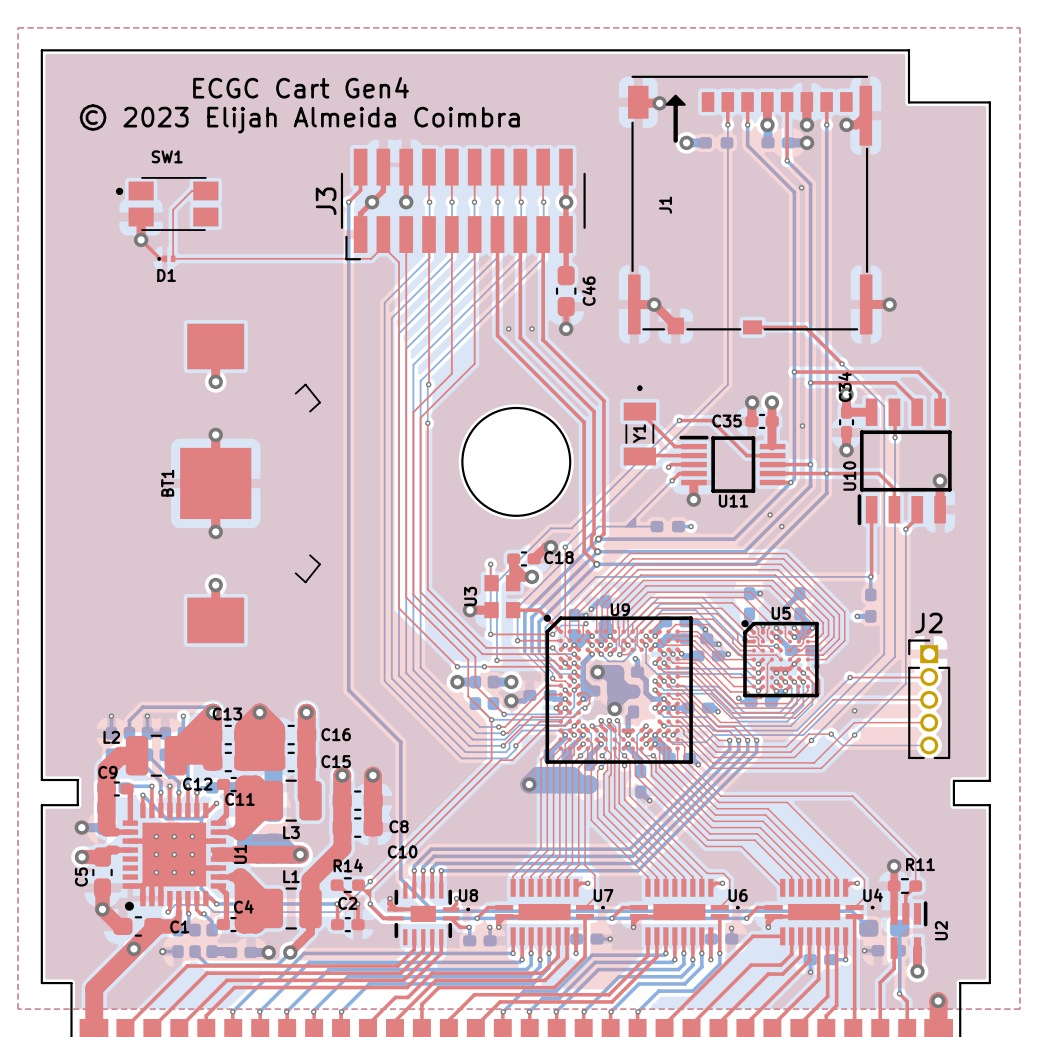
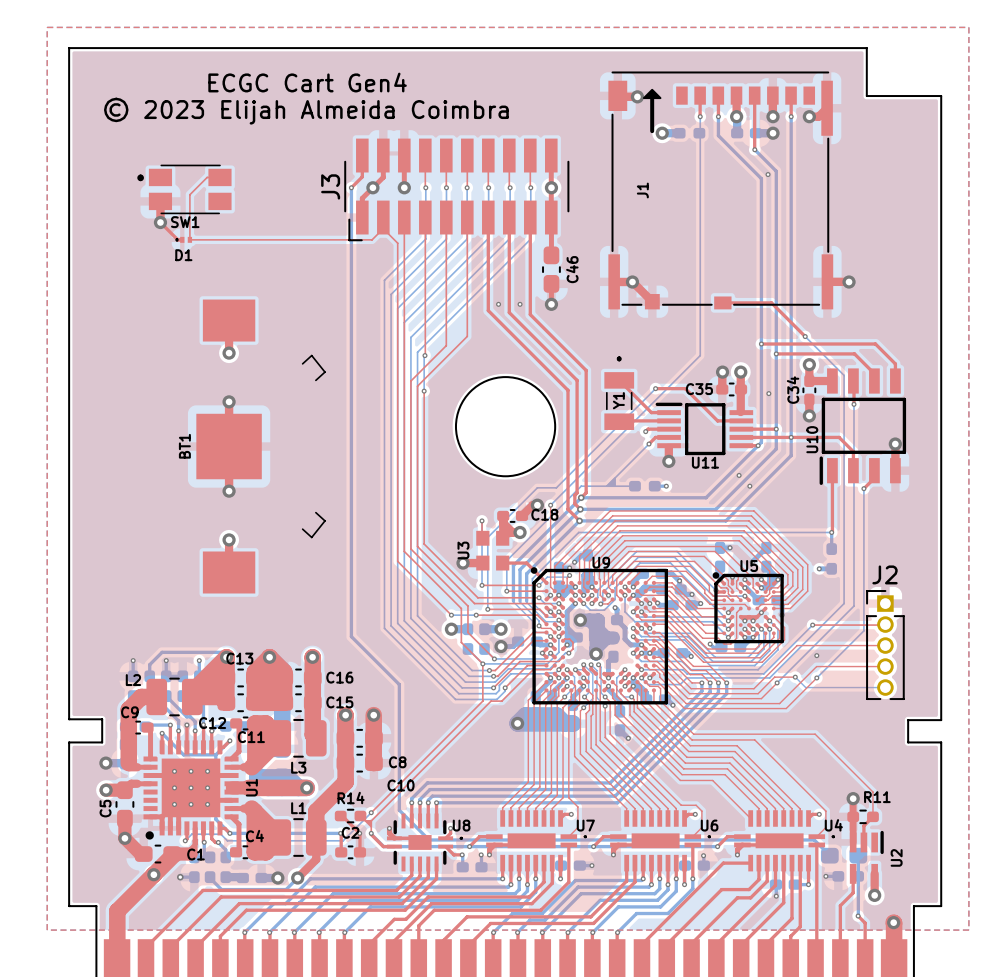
SW1 name position: SW1 (167, 156) -> SW1 (185, 222)
C34 name position: C34 (844, 387) -> C34 (793, 390)

